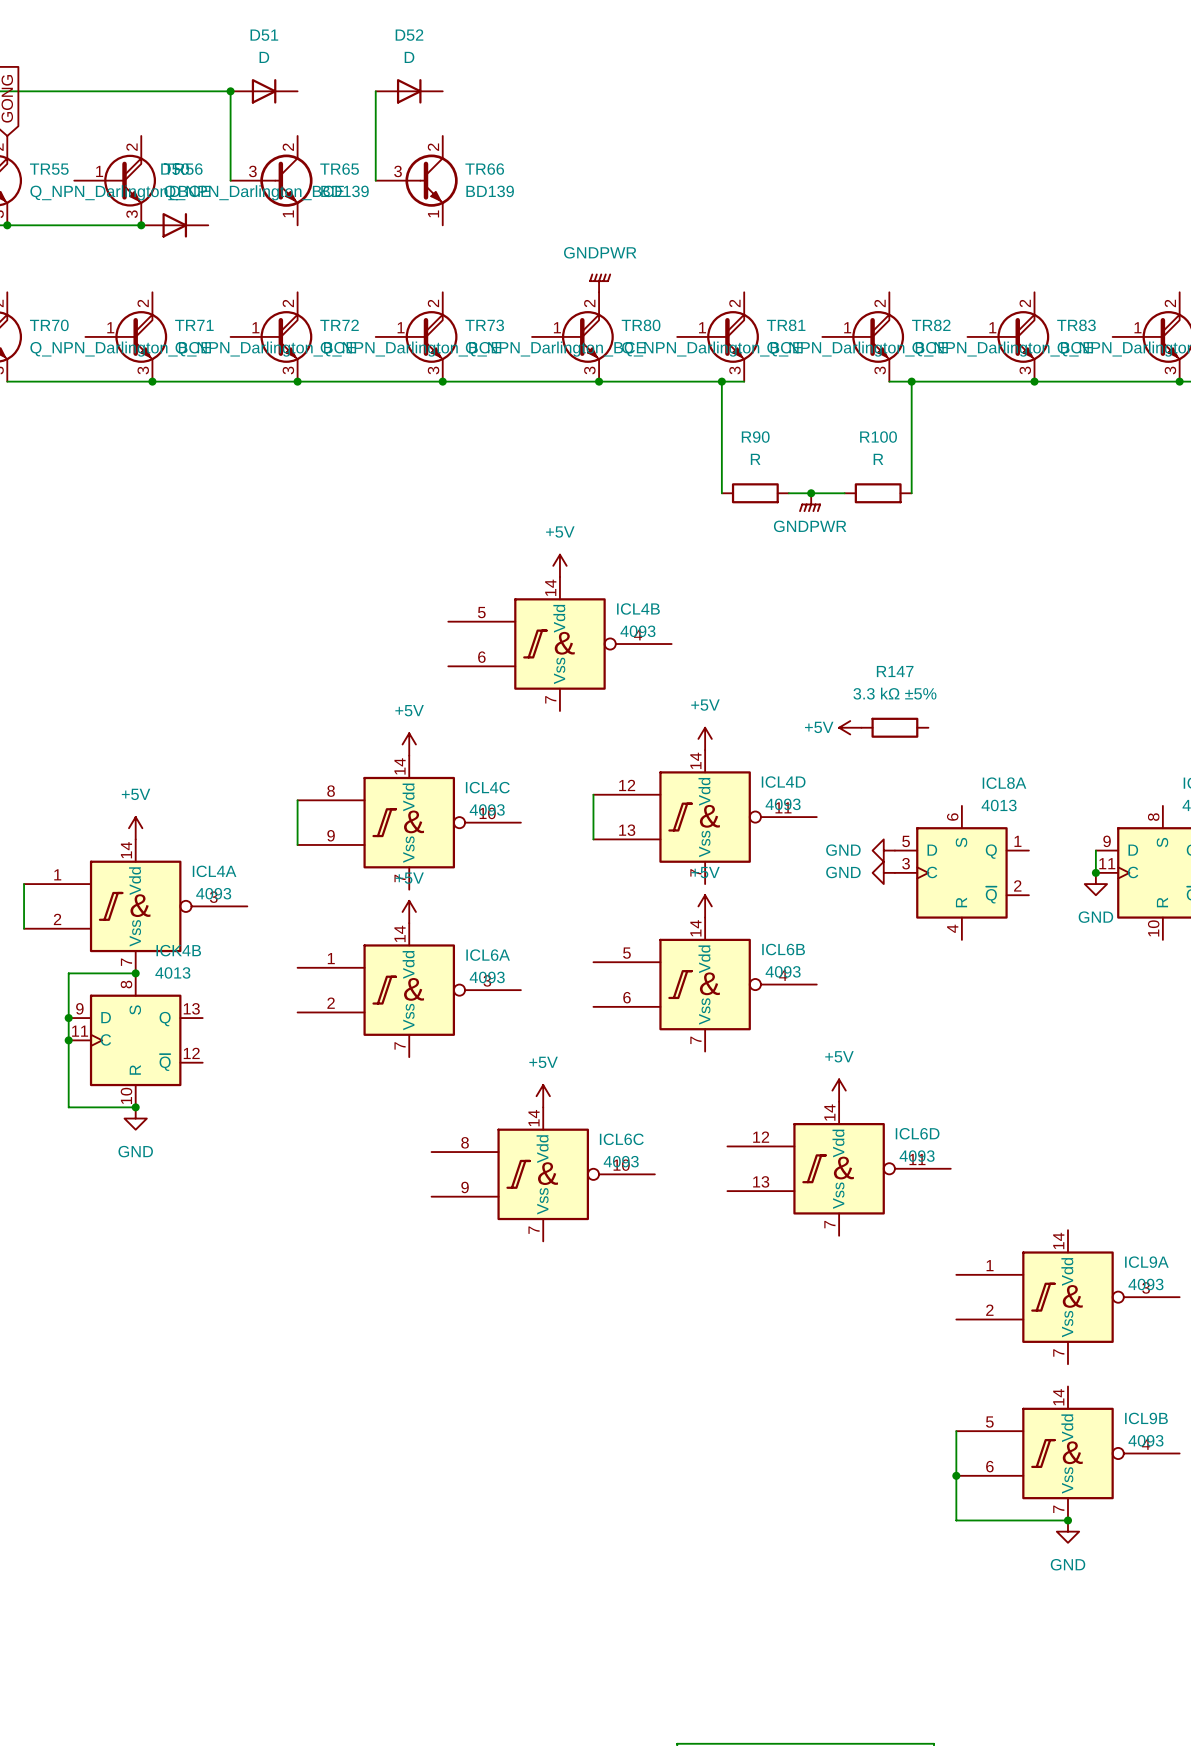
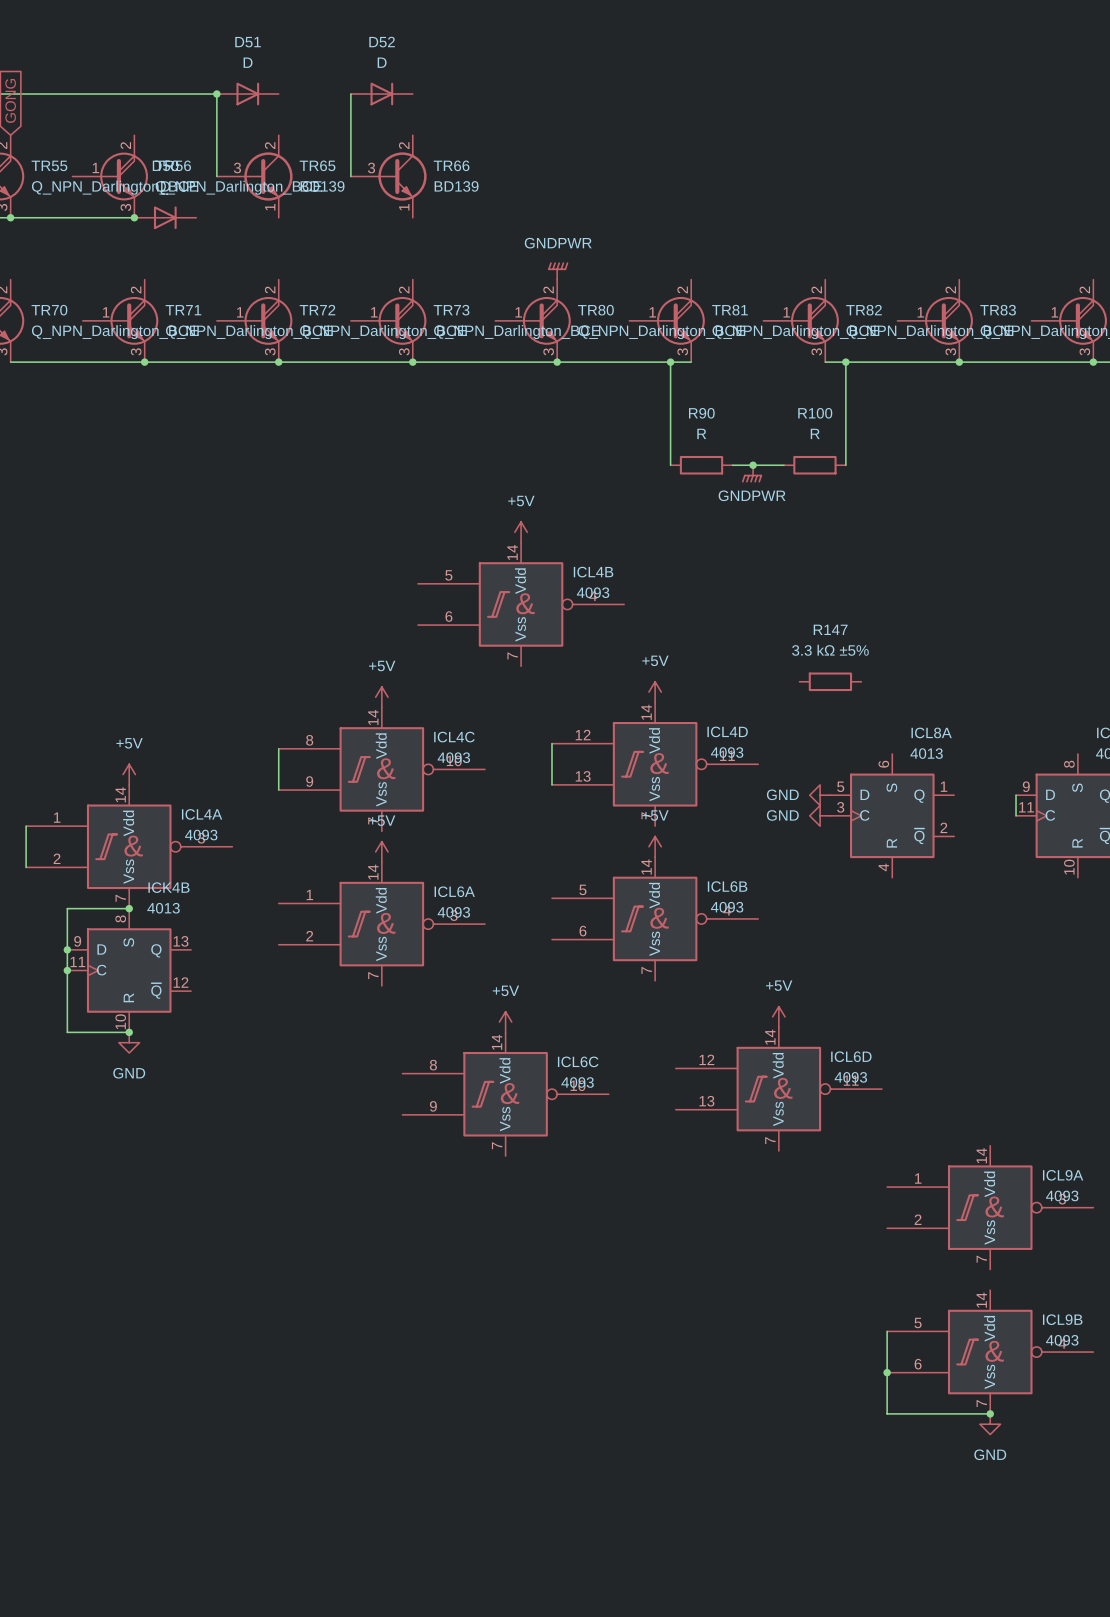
power symbol: +5V (850, 727) -> none
junction: (1095, 872) -> none
power symbol: GND (1095, 884) -> none

